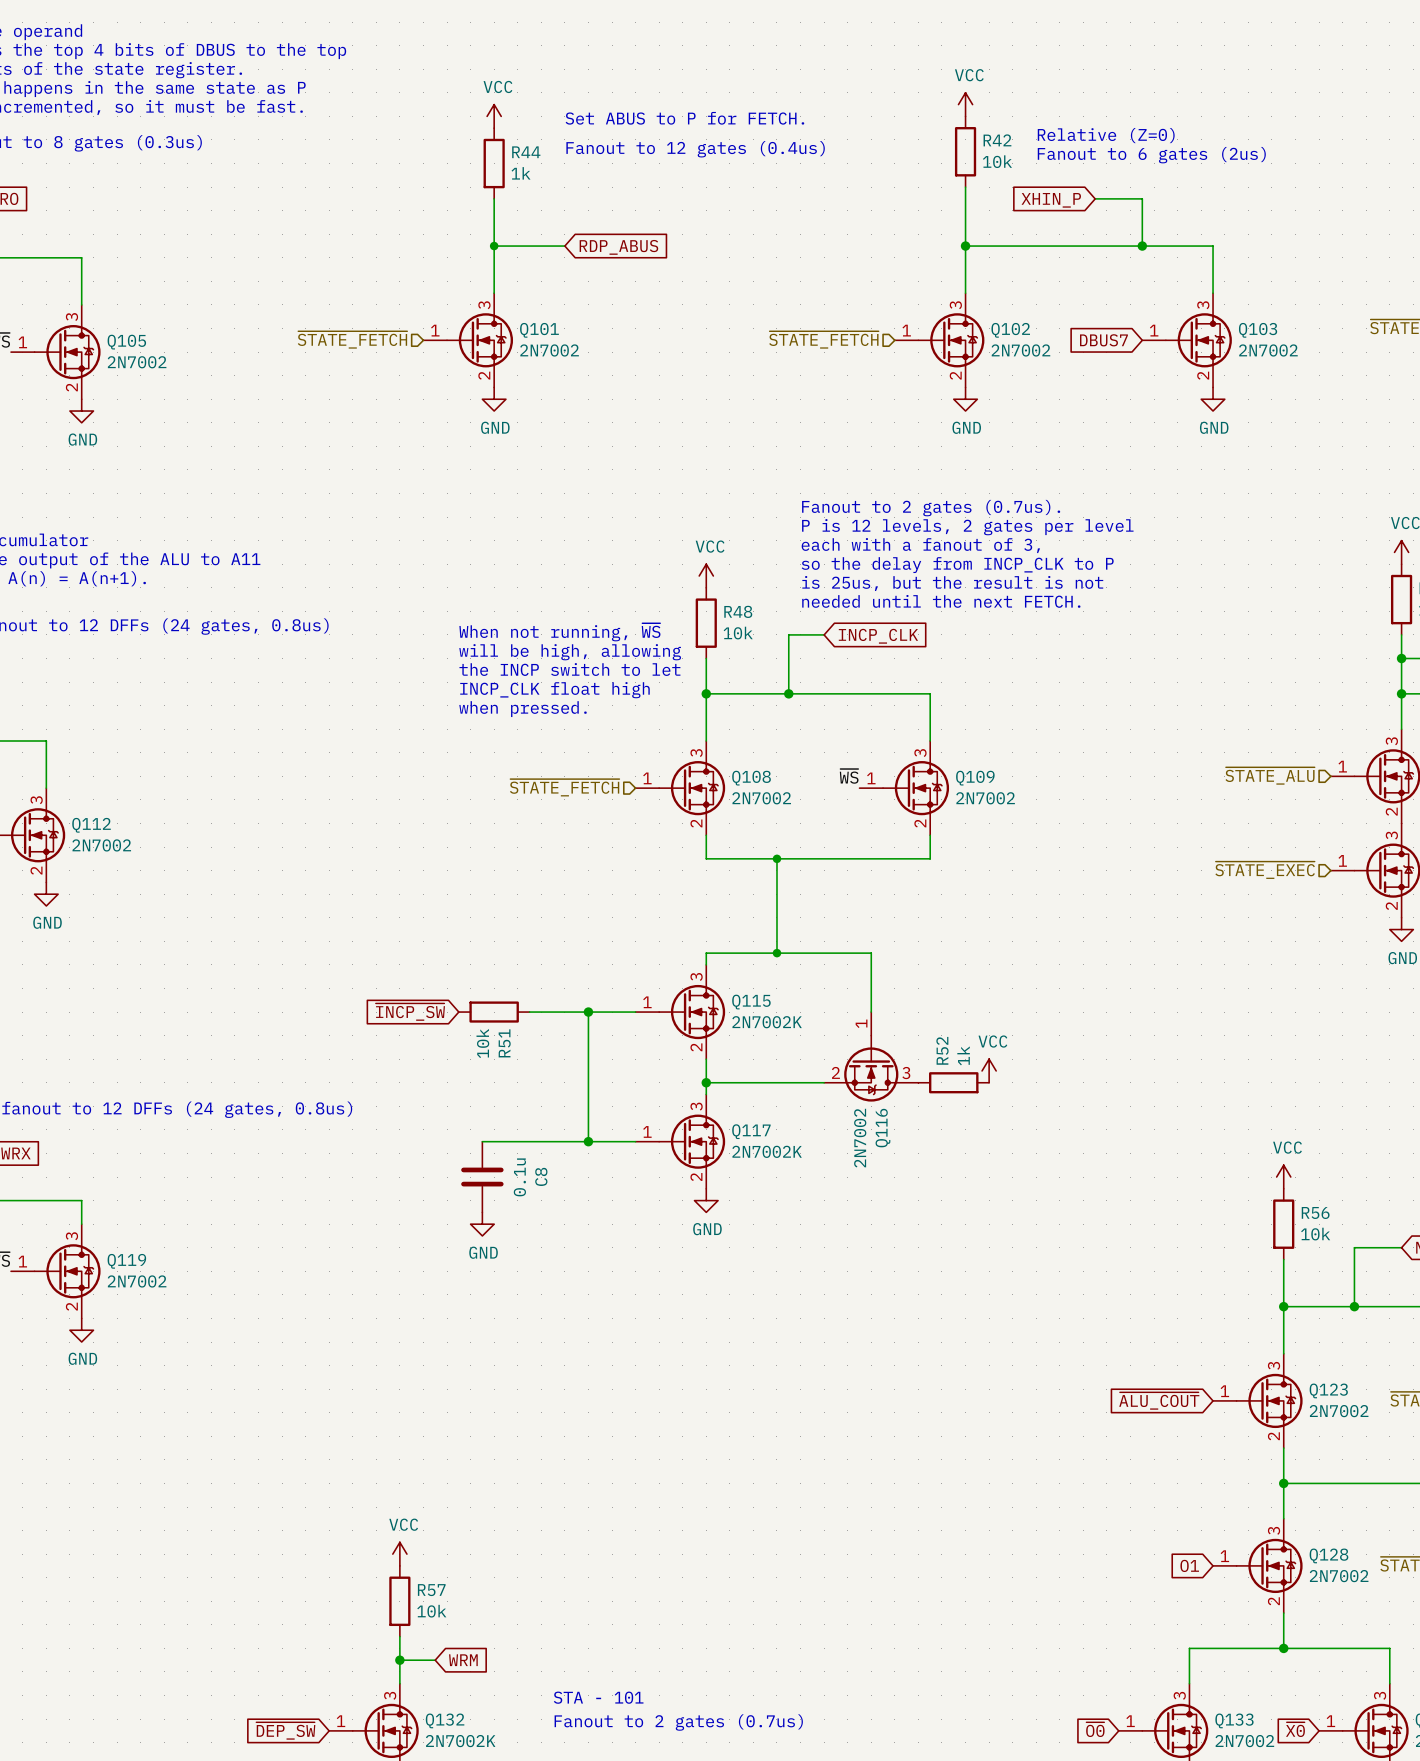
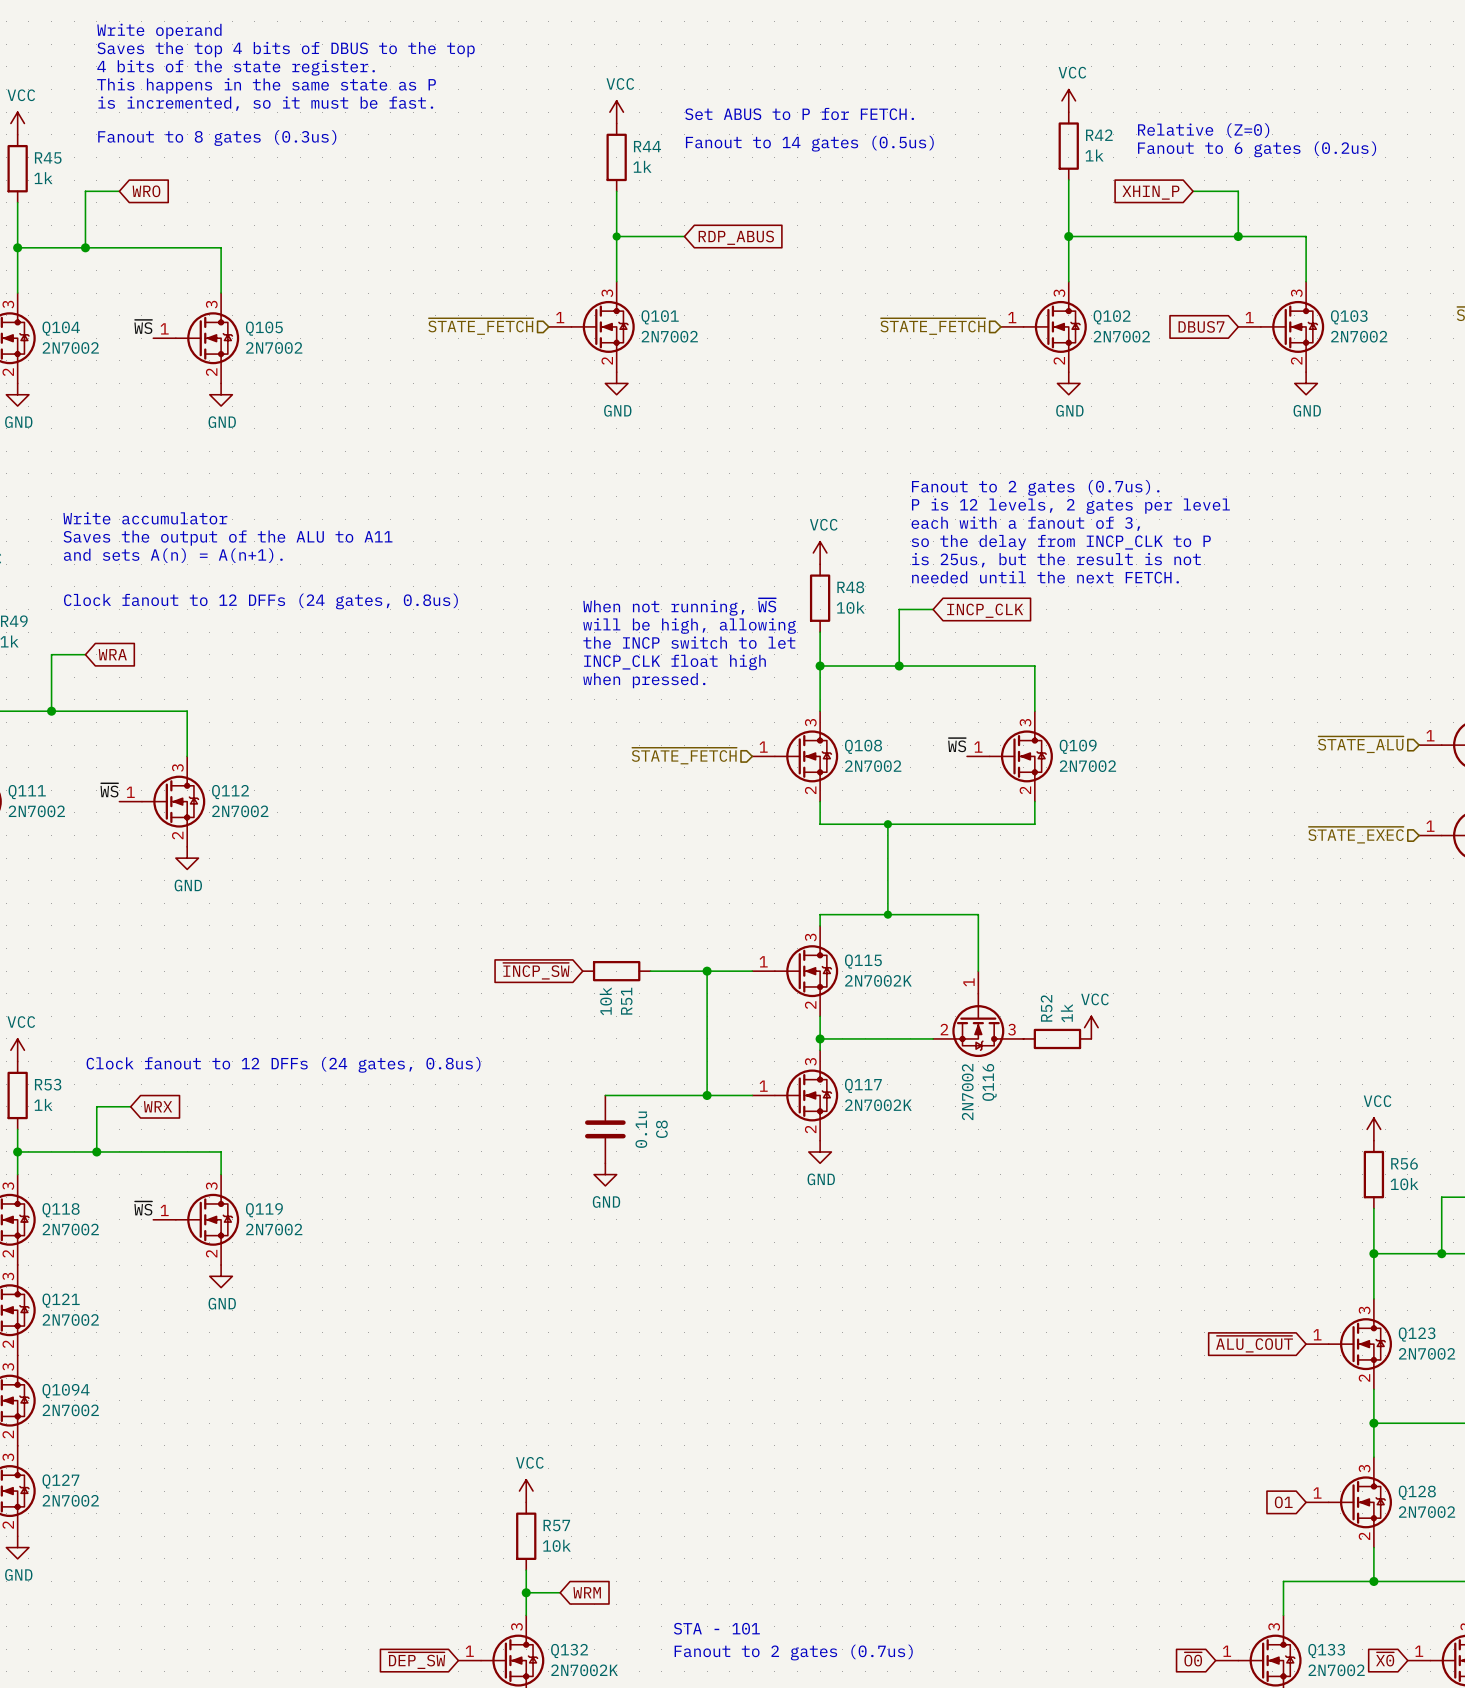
text: Fanout to 12 gates (0.4us) (695, 149) -> Fanout to 14 gates (0.5us) (809, 143)
text: Fanout to 6 gates (2us) (1151, 155) -> Fanout to 6 gates (0.2us) (1257, 149)
R42 value: 10k (997, 161) -> 1k (1094, 155)

